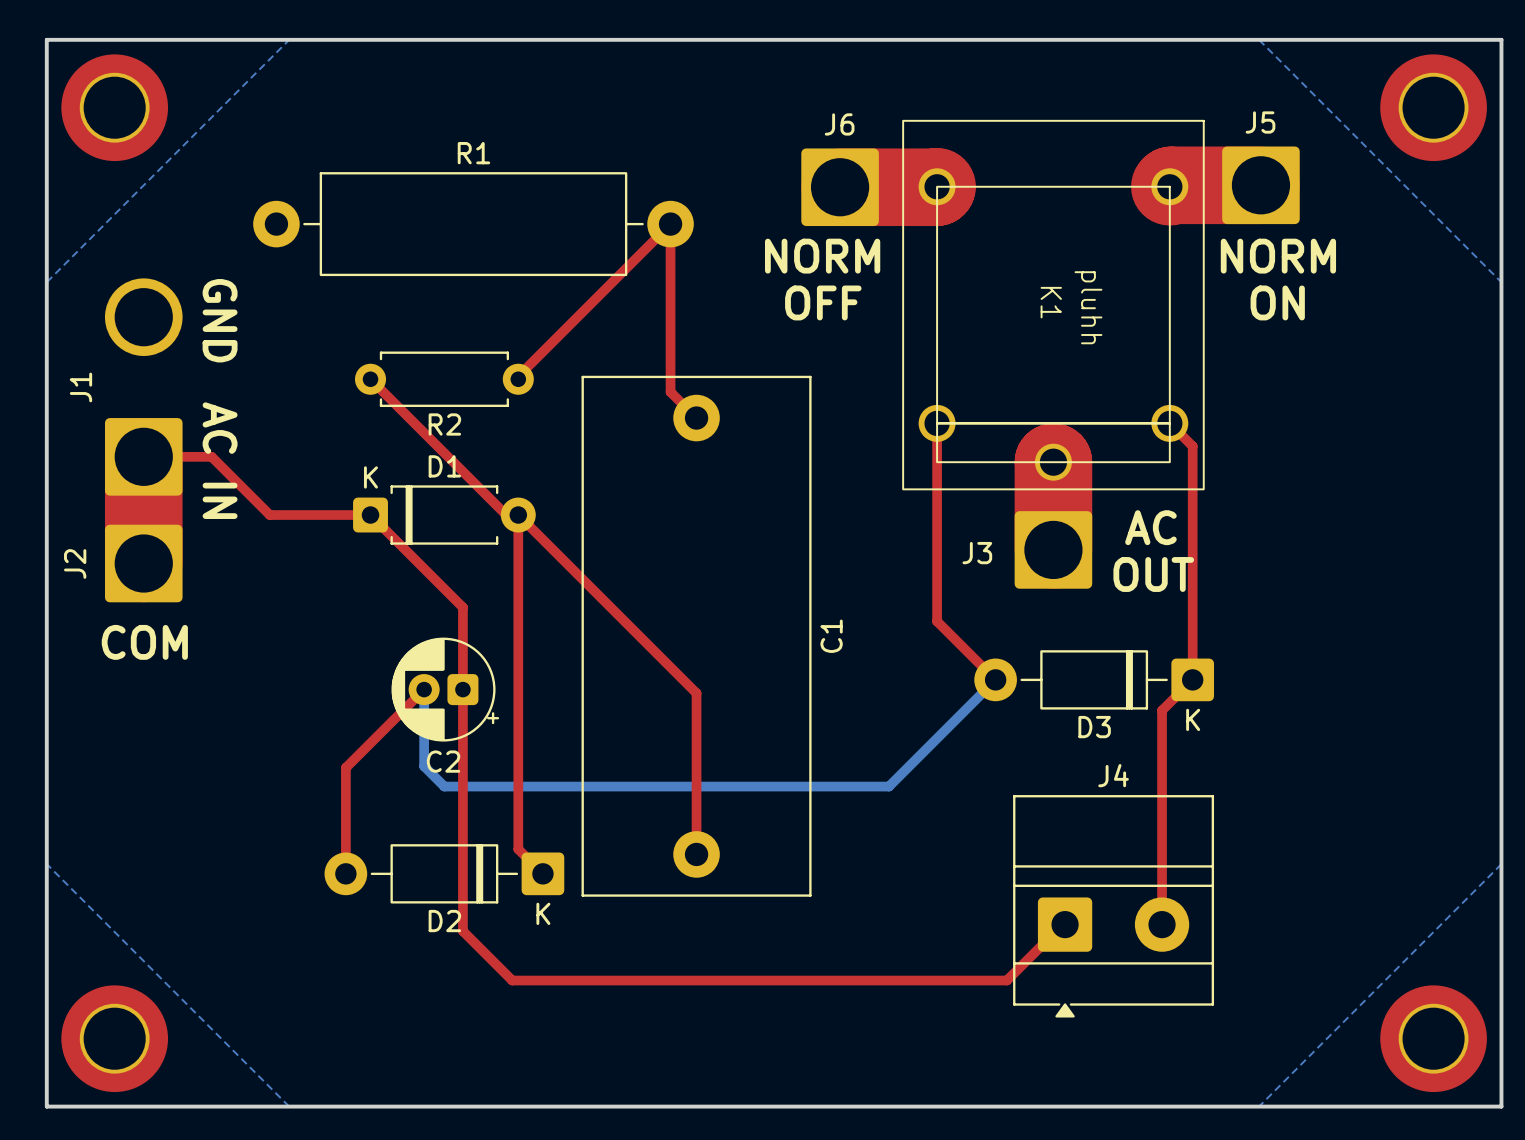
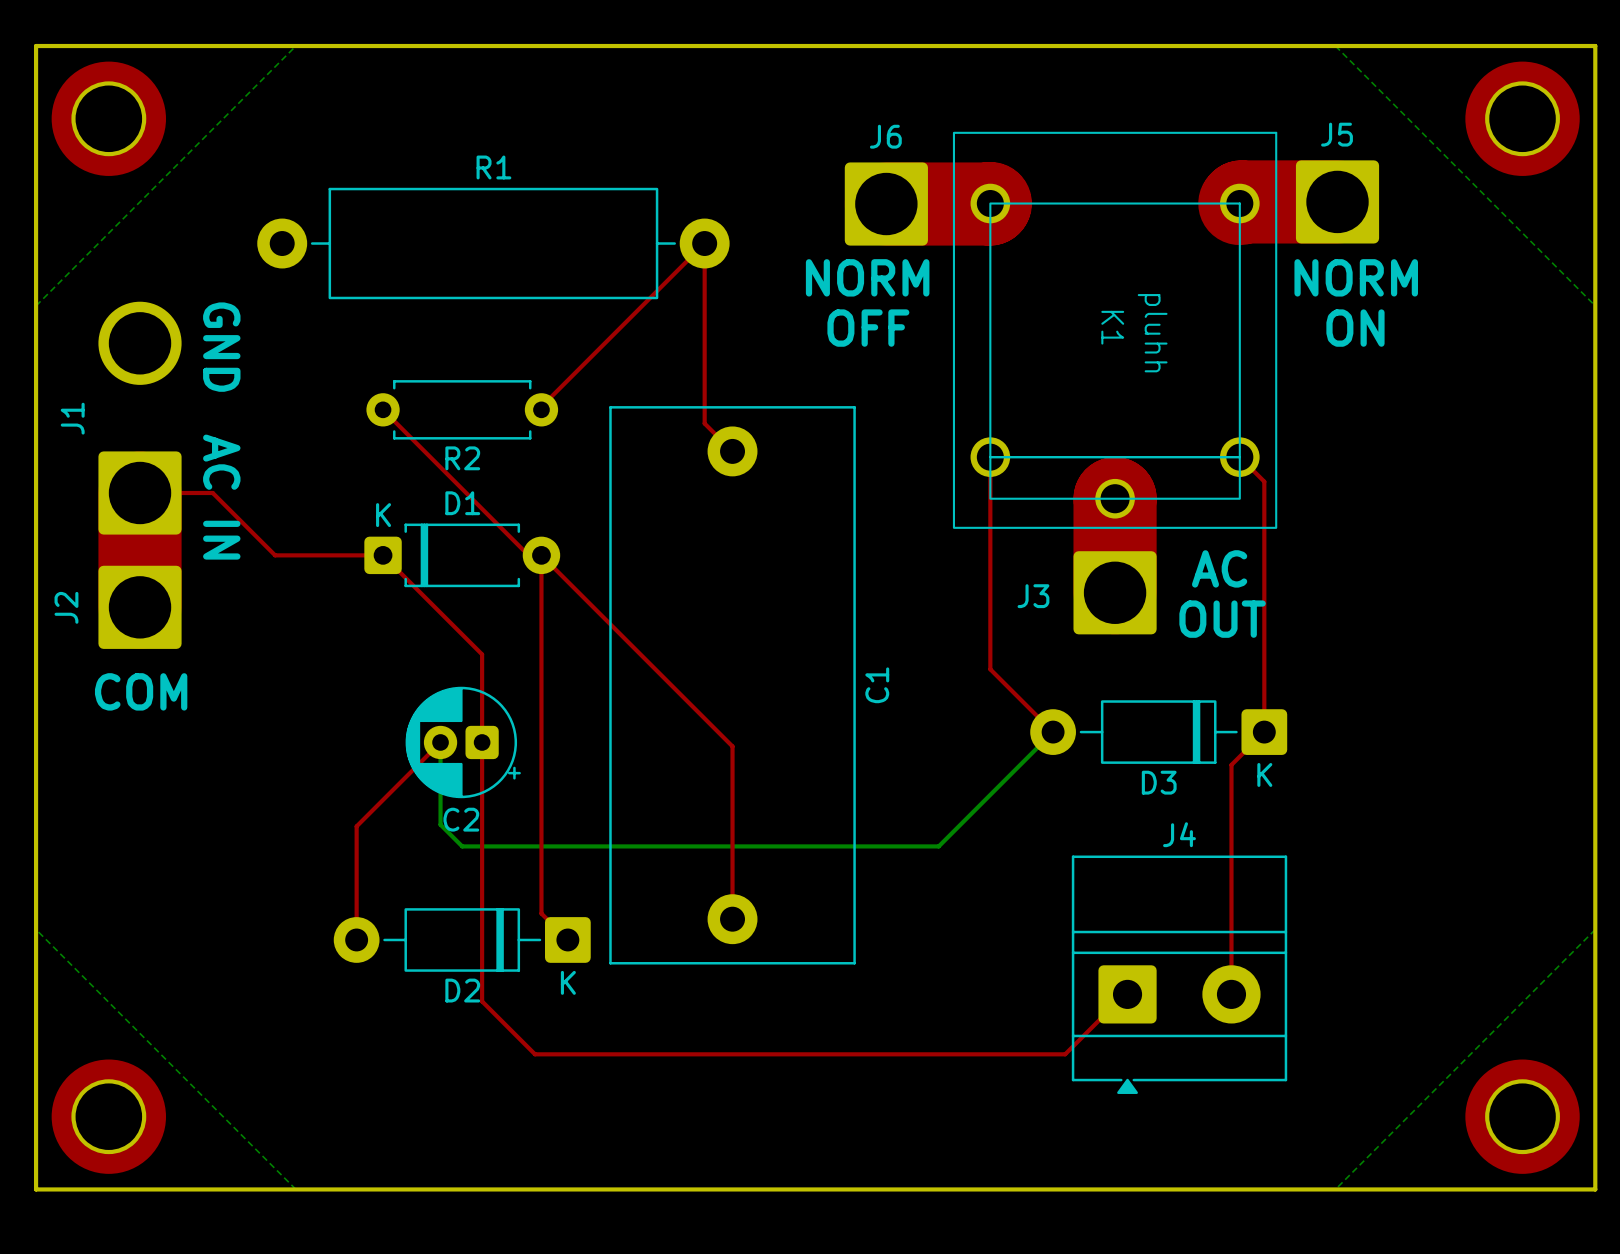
top track width: thick (370, 379) (506, 515) (518, 515) -> thin (383, 409) (528, 555) (541, 555)
top track width: thick (518, 379) (518, 376) (670, 224) (670, 392) (696, 418) -> thin (541, 409) (541, 406) (704, 243) (704, 423) (732, 451)
top track width: thick (937, 423) (937, 621) (995, 679) -> thin (990, 457) (990, 669) (1053, 732)
top track width: thick (1169, 423) (1192, 446) (1192, 679) (1162, 710) (1162, 924) -> thin (1239, 457) (1264, 481) (1264, 732) (1231, 764) (1231, 994)
top track width: thick (143, 456) (211, 456) (269, 515) (370, 515) (462, 607) (462, 931) (512, 980) (1006, 980) (1062, 924) (1065, 924) -> thin (140, 492) (212, 492) (275, 555) (383, 555) (482, 654) (482, 1001) (535, 1054) (1065, 1054) (1125, 994) (1127, 994)
top track width: thick (518, 515) (518, 849) (542, 873) -> thin (541, 555) (541, 913) (567, 939)
top track width: thick (518, 515) (696, 693) (696, 854) -> thin (541, 555) (732, 746) (732, 919)
bottom track width: thick (995, 679) (888, 786) (444, 786) (424, 766) (424, 689) -> thin (1053, 732) (938, 846) (462, 846) (440, 824) (440, 742)
top track width: thick (424, 689) (345, 767) (345, 873) -> thin (440, 742) (356, 826) (356, 939)

